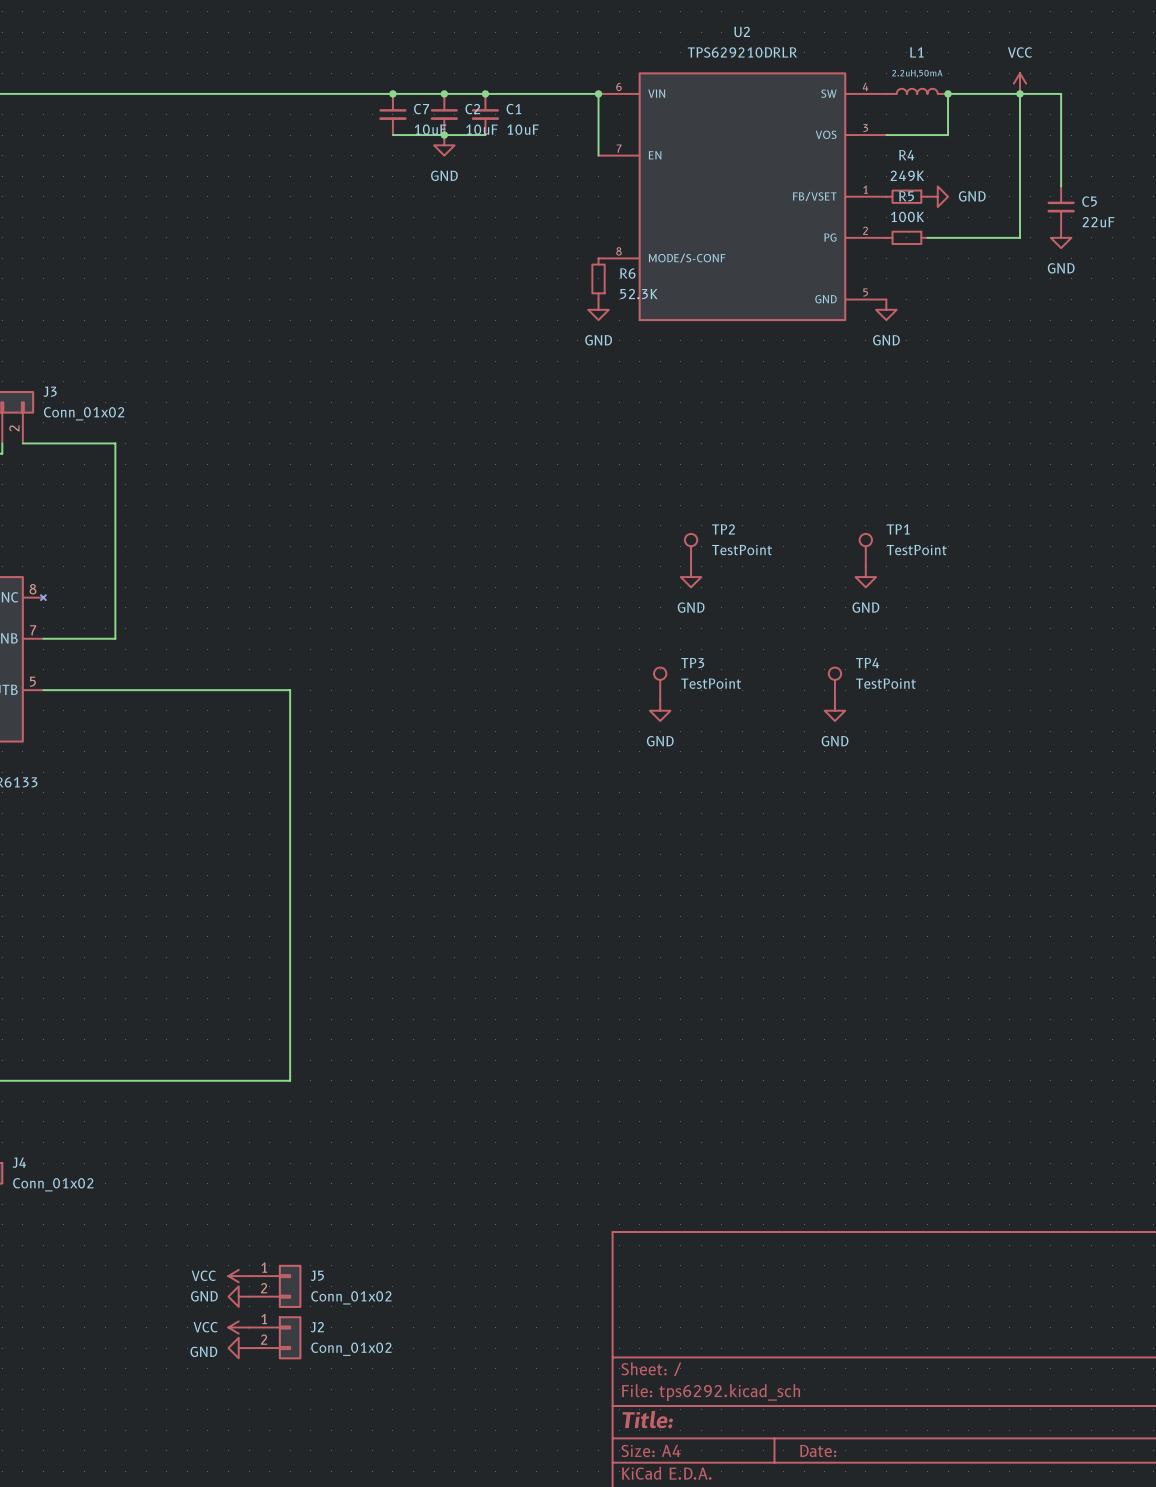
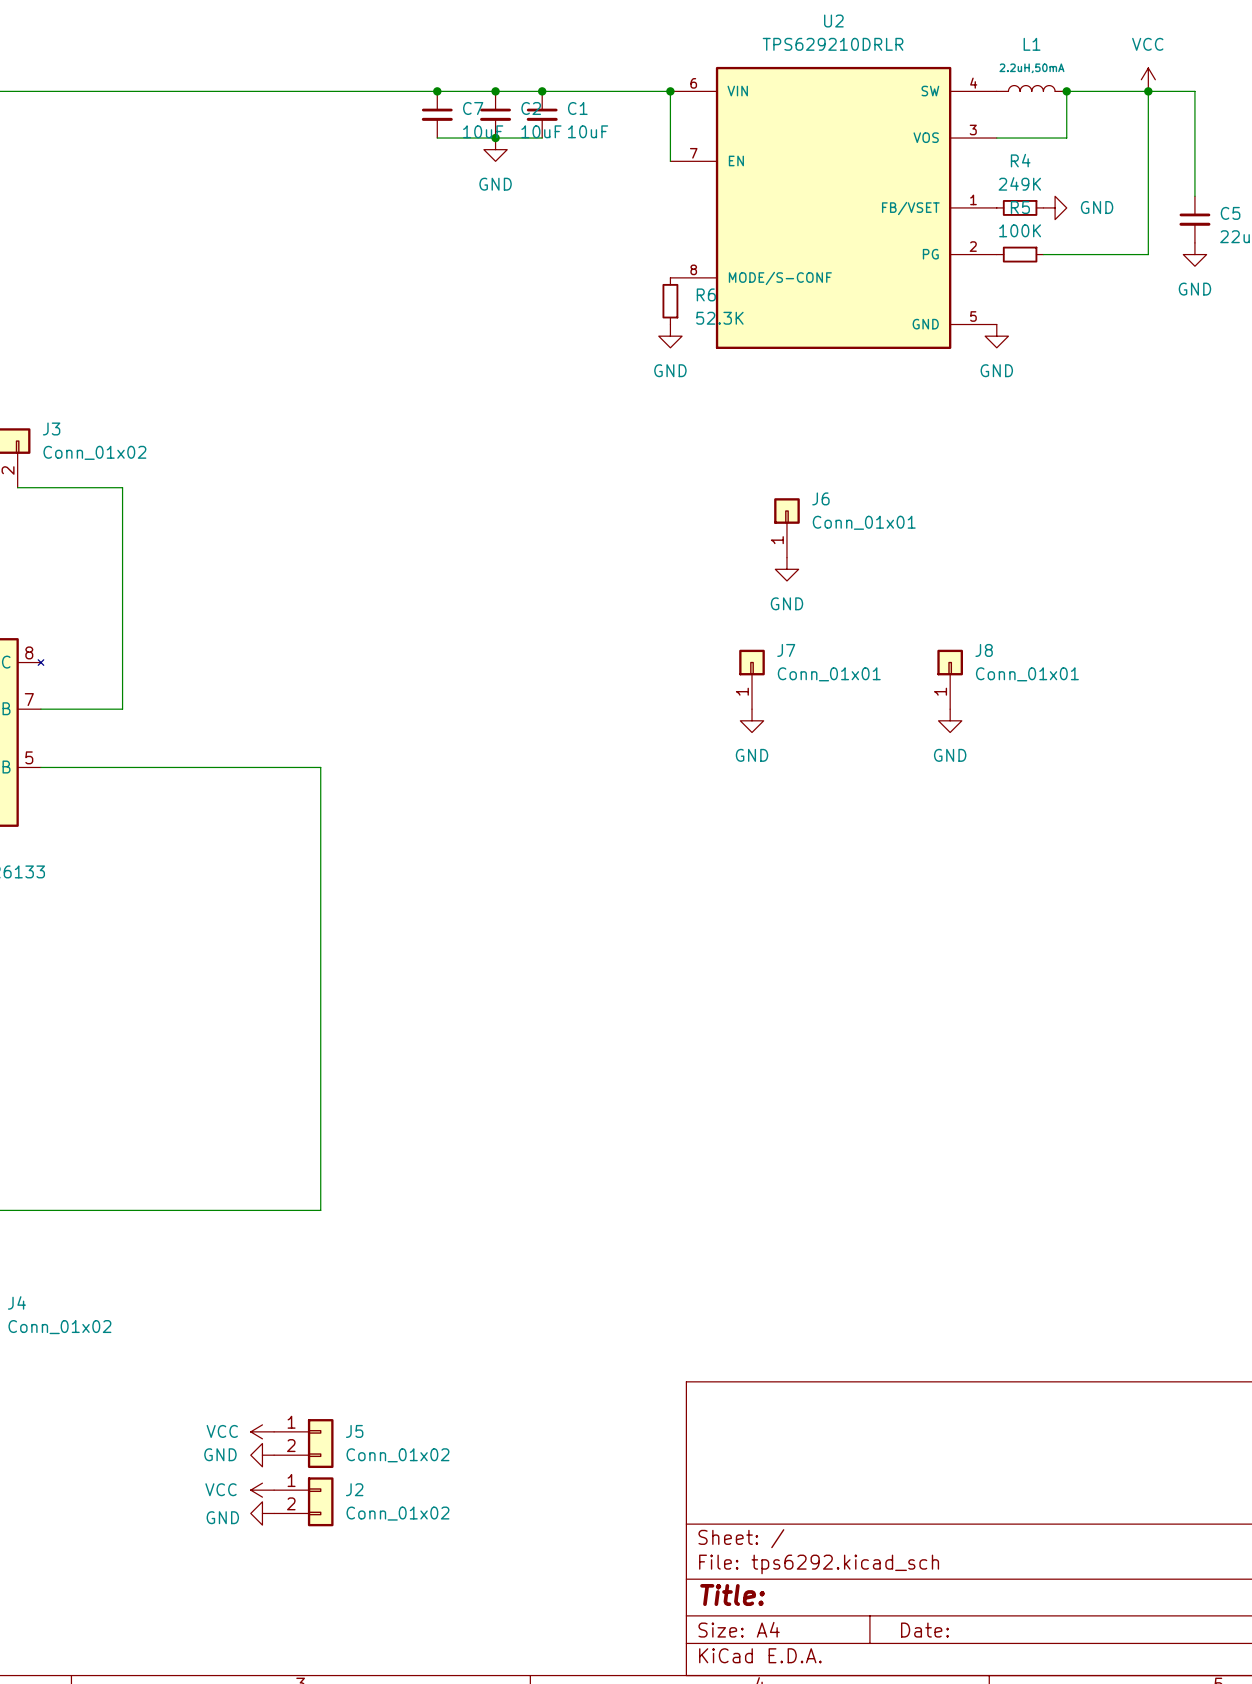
J6: none -> Conn_01x01 (786, 527)
power symbol: none -> GND (786, 569)
TP2: TestPoint (691, 550) -> none
TP1: TestPoint (865, 550) -> none
power symbol: GND (691, 577) -> none
power symbol: GND (865, 577) -> none
J7: none -> Conn_01x01 (752, 679)
J8: none -> Conn_01x01 (950, 679)
power symbol: none -> GND (752, 720)
power symbol: none -> GND (950, 720)
TP3: TestPoint (660, 683) -> none
TP4: TestPoint (834, 683) -> none
power symbol: GND (660, 710) -> none
power symbol: GND (834, 710) -> none

